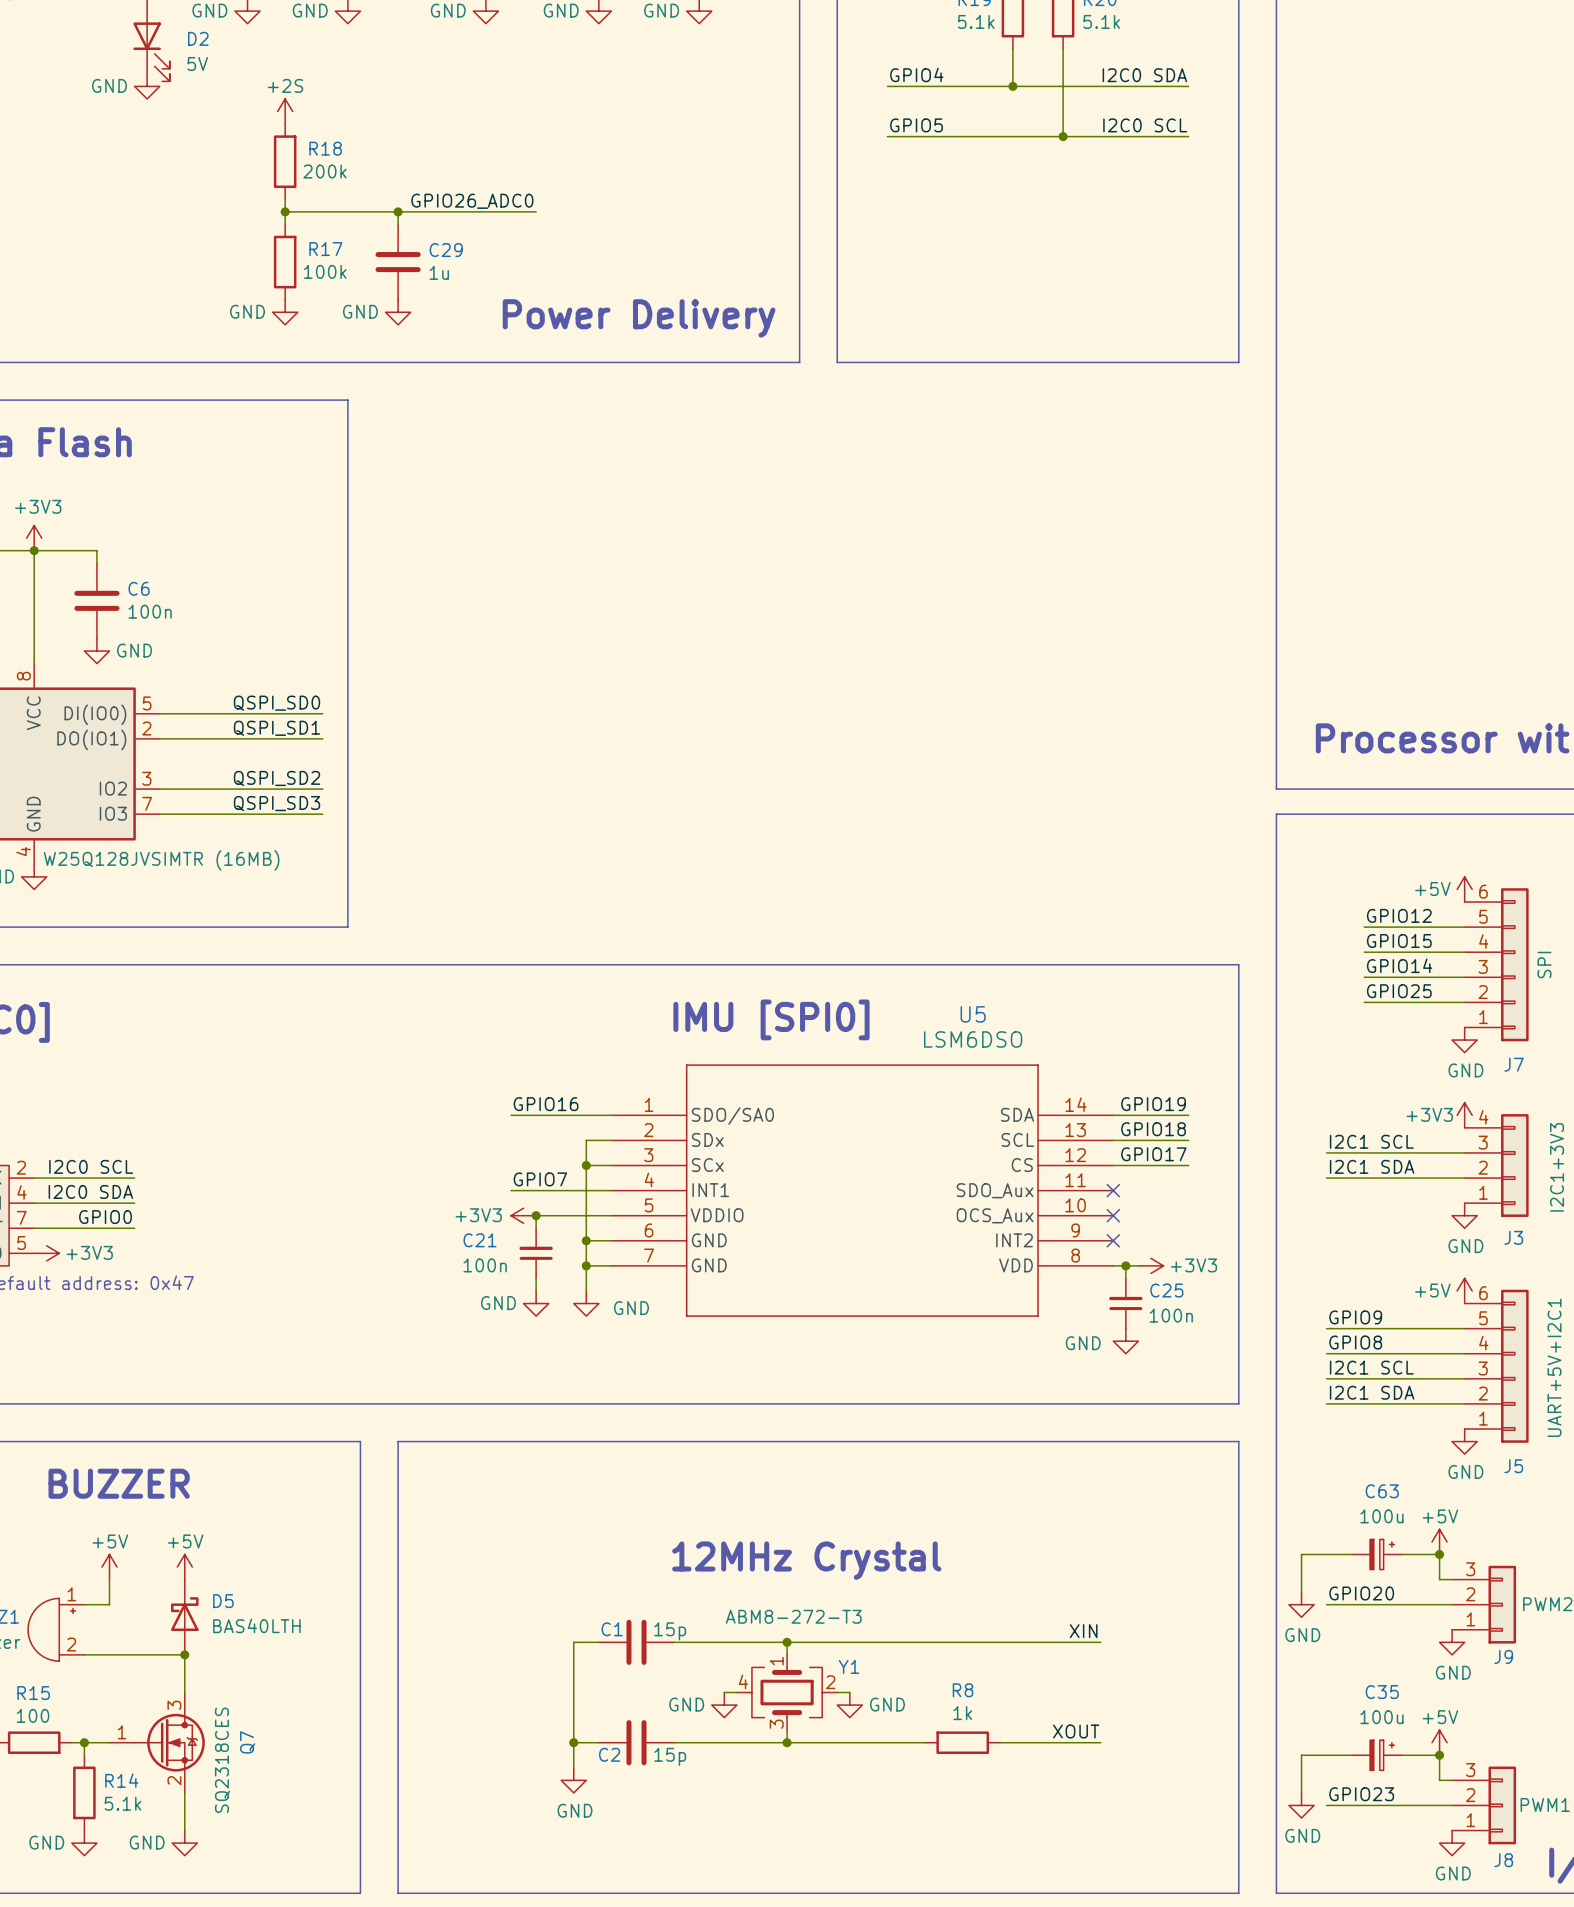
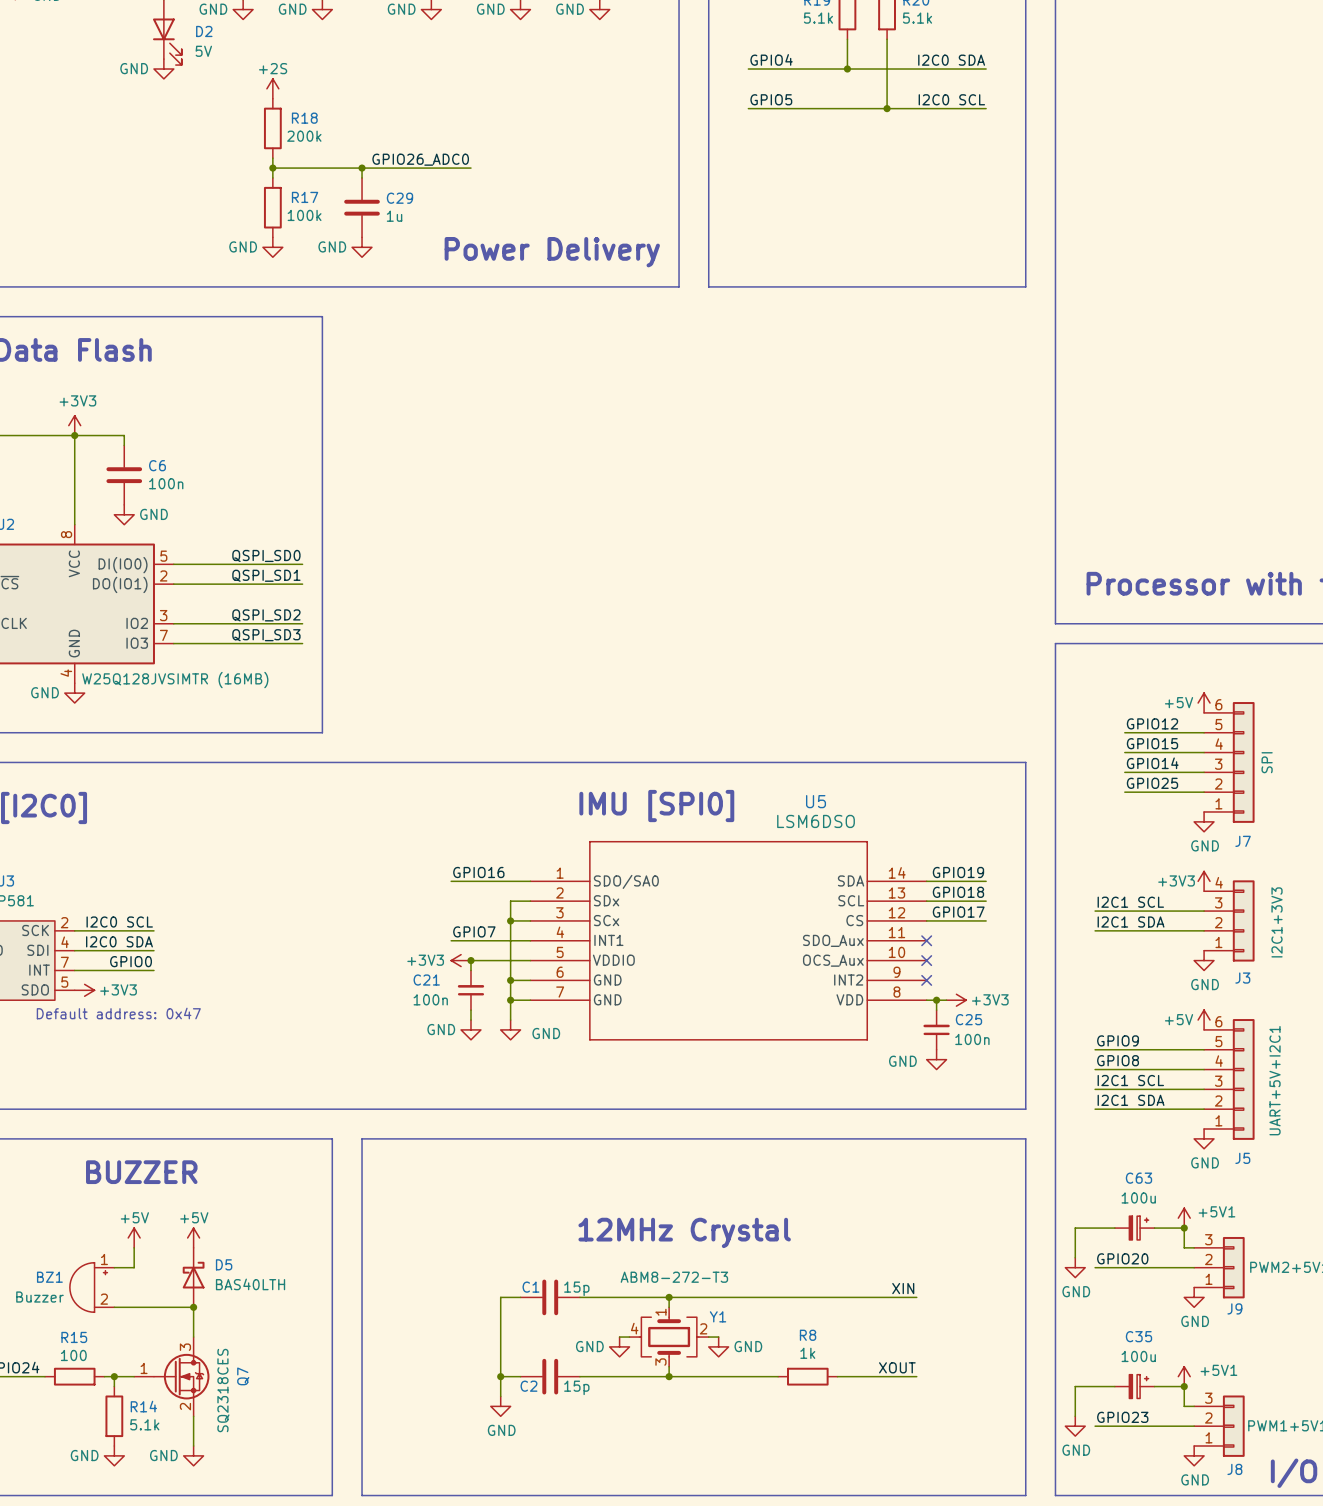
power symbol: +5V (1439, 1541) -> +5V1 (1184, 1218)
power symbol: +5V (1439, 1742) -> +5V1 (1184, 1376)

